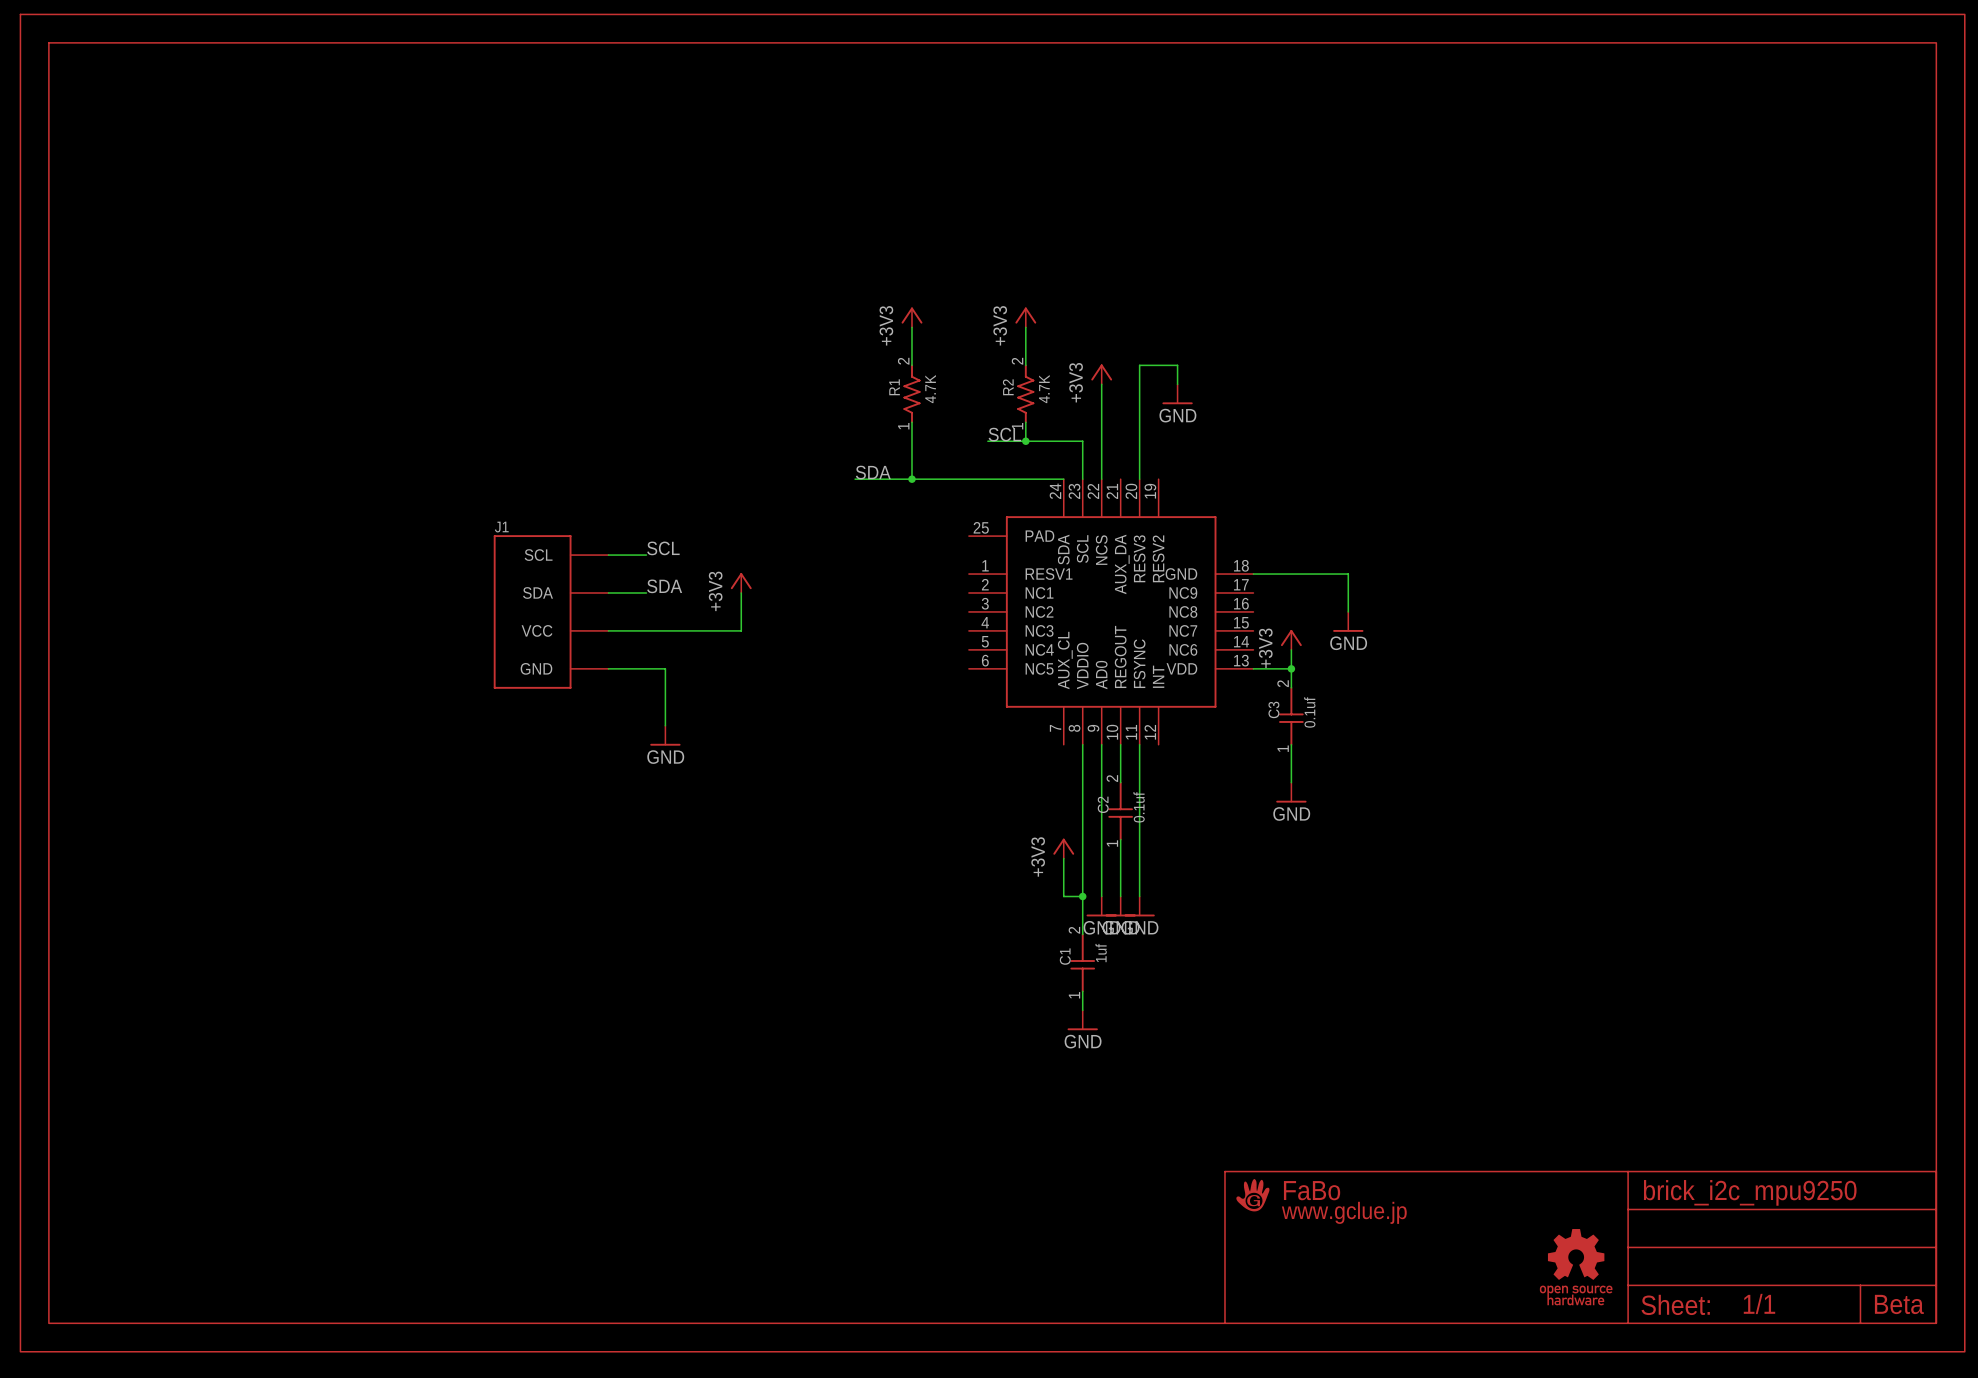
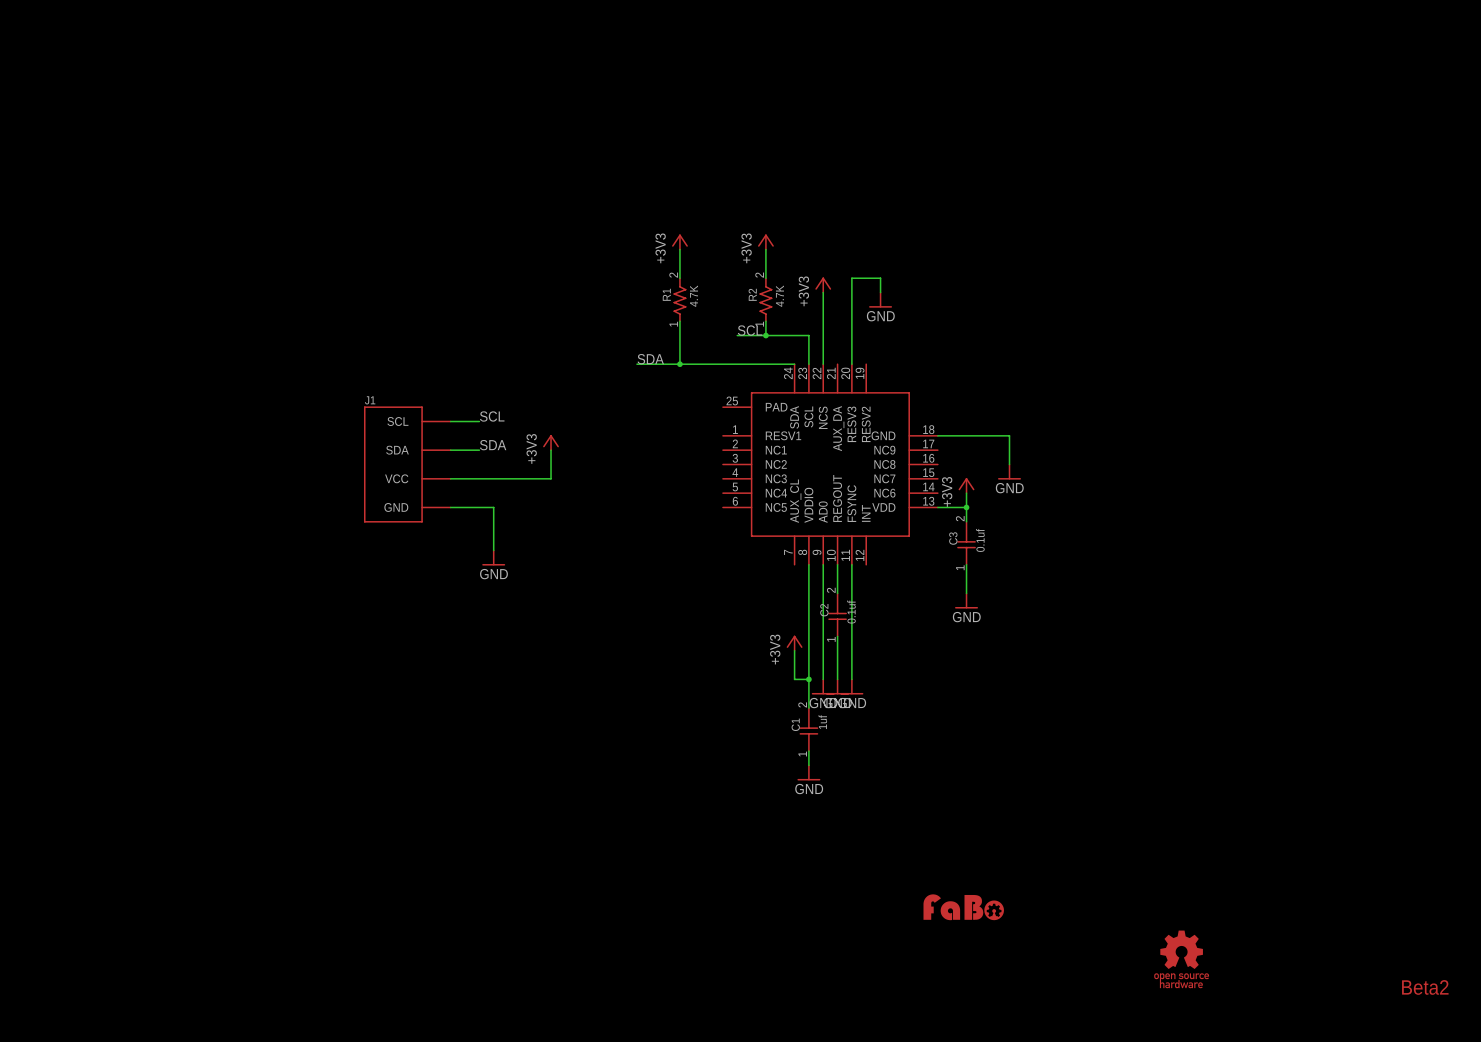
part: (992, 683) -> none
part: none -> (963, 907)
text: Beta (1899, 1304) -> Beta2 (1425, 987)

